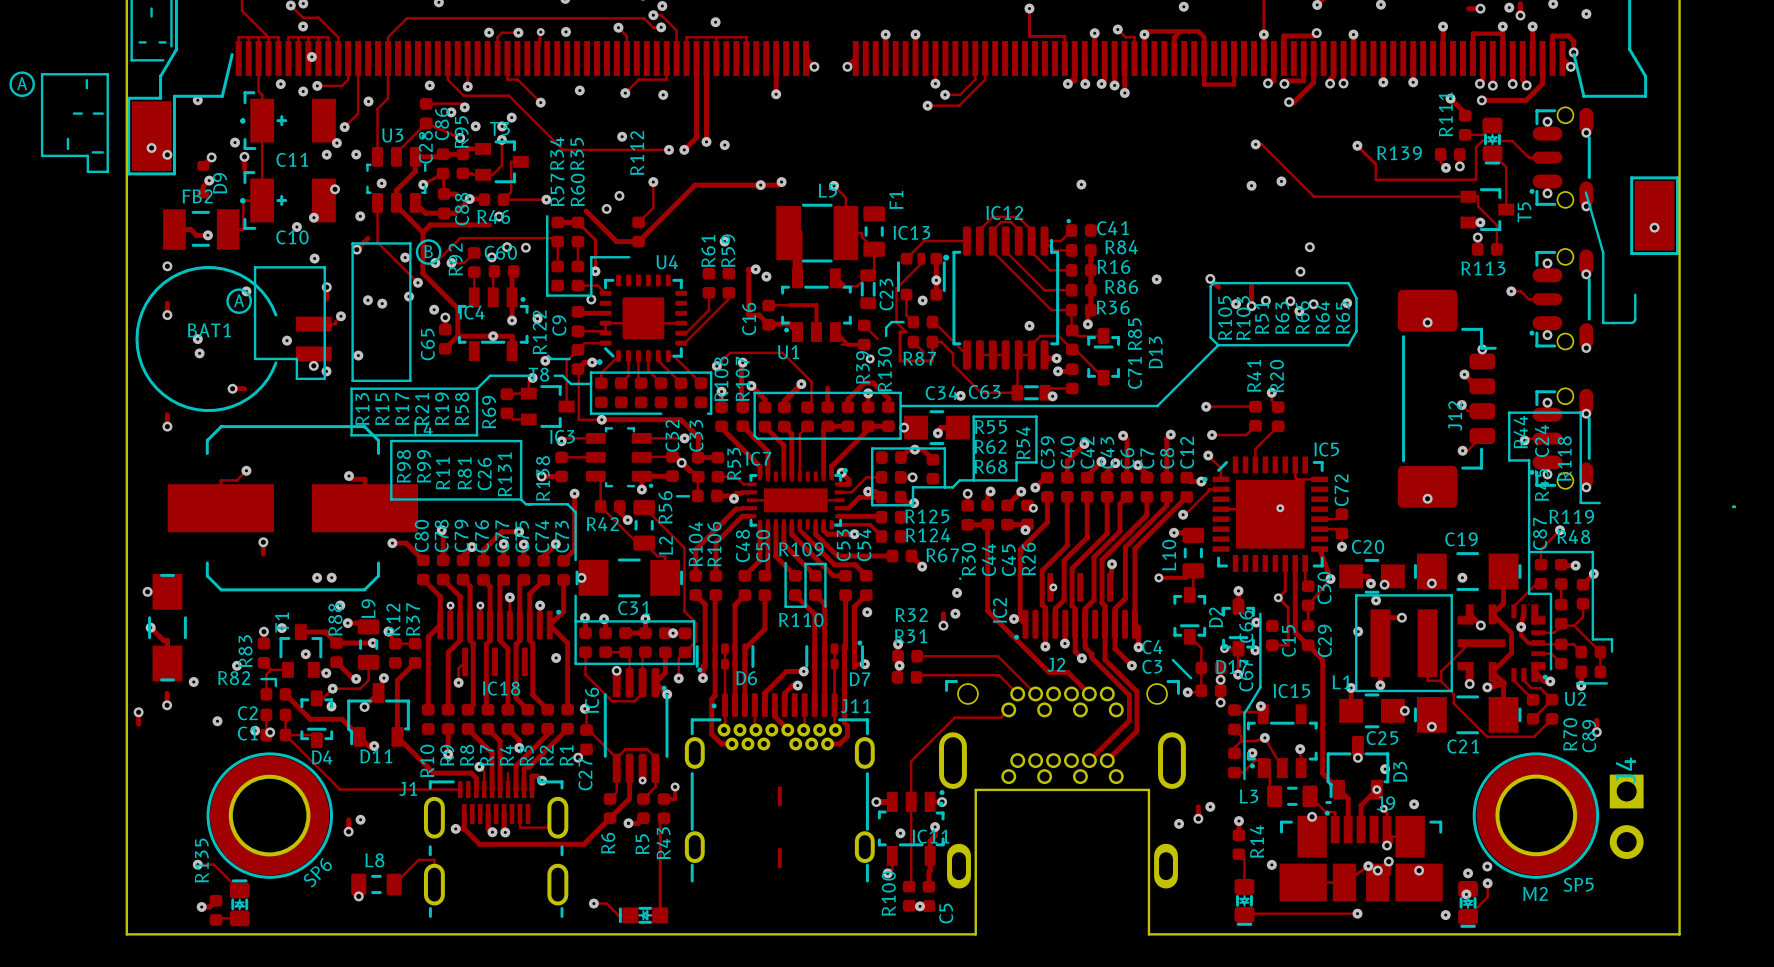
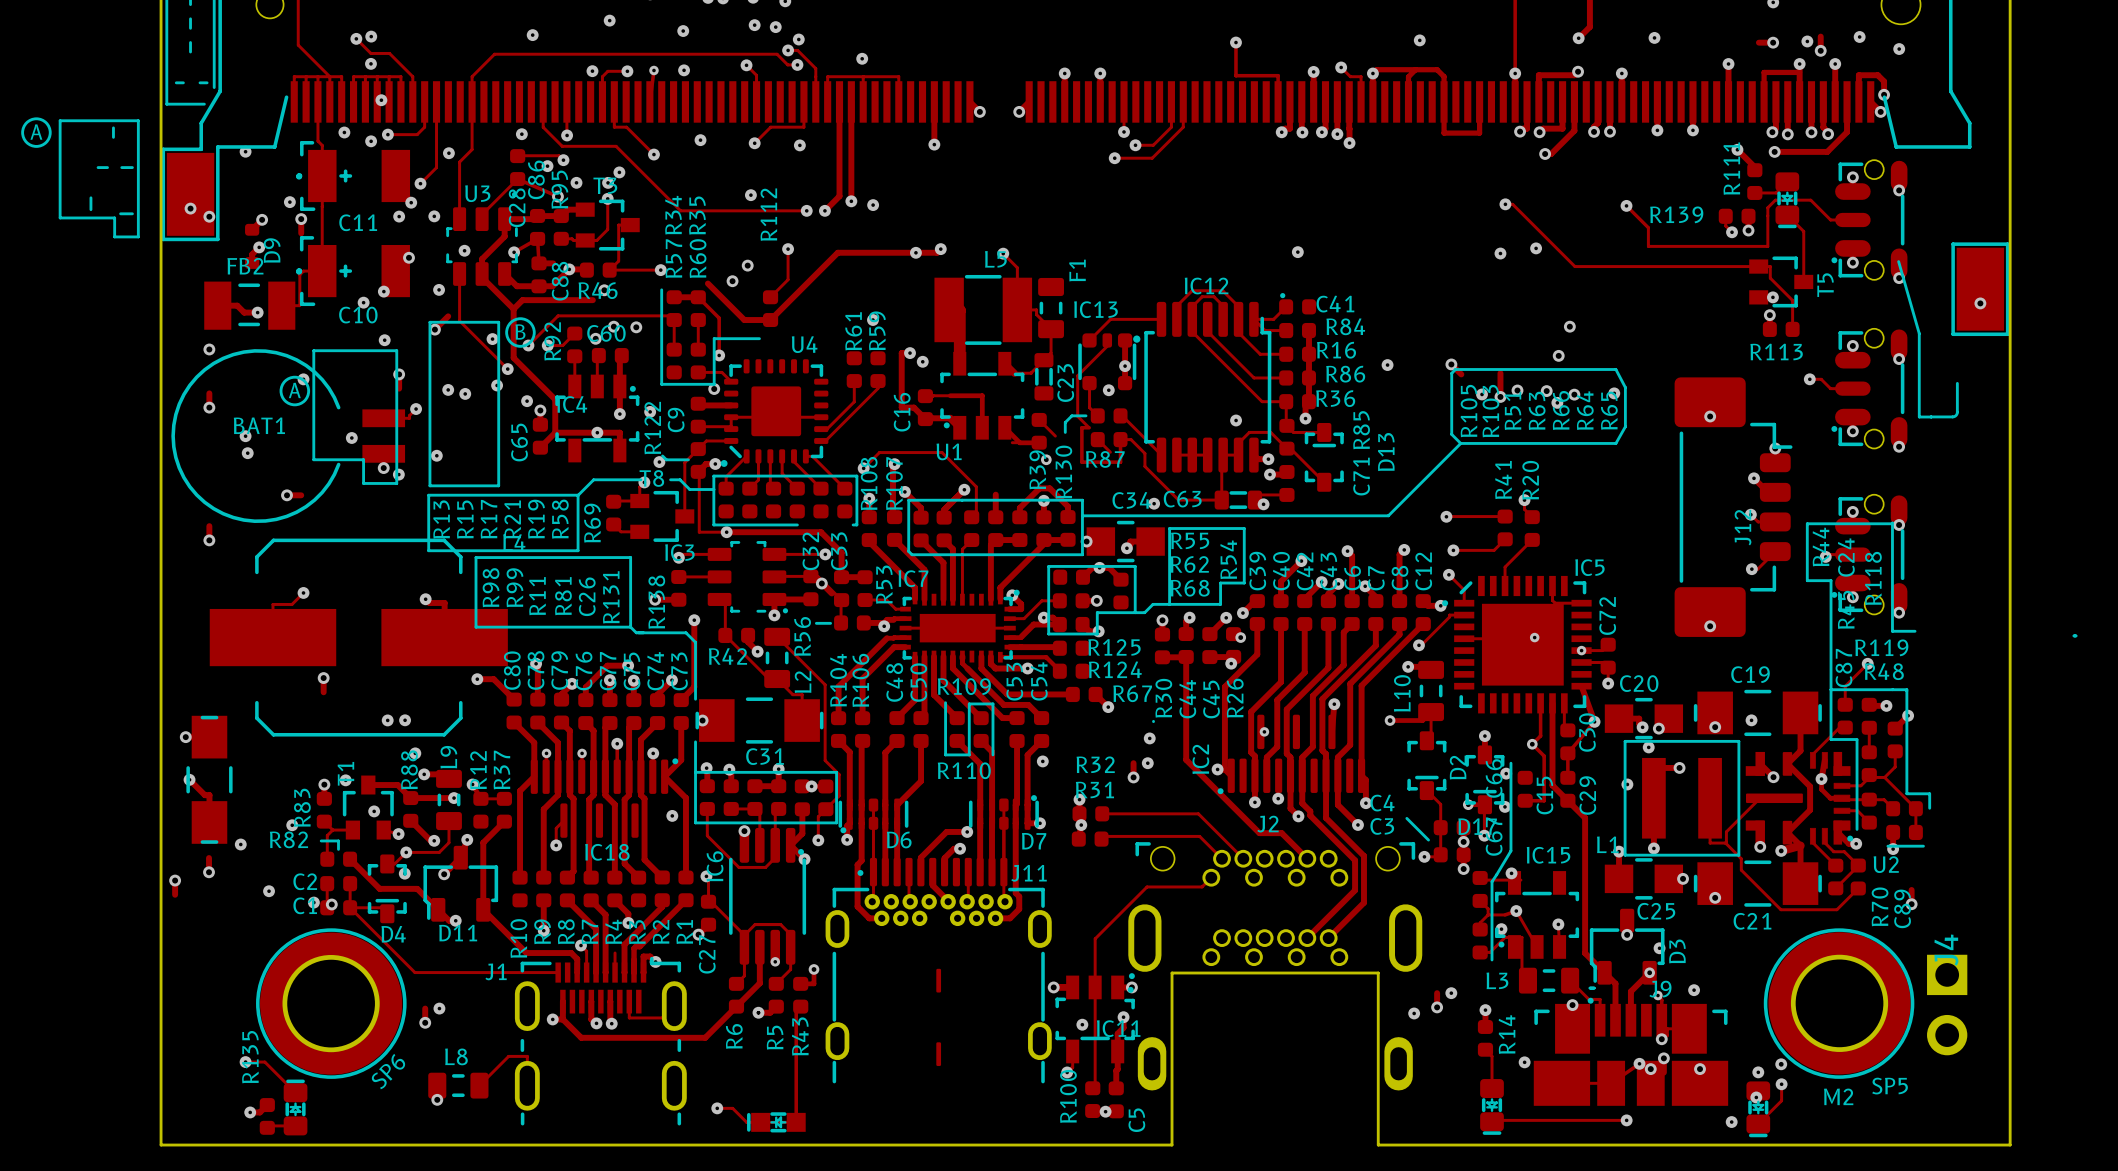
via: none -> (1581, 650)

